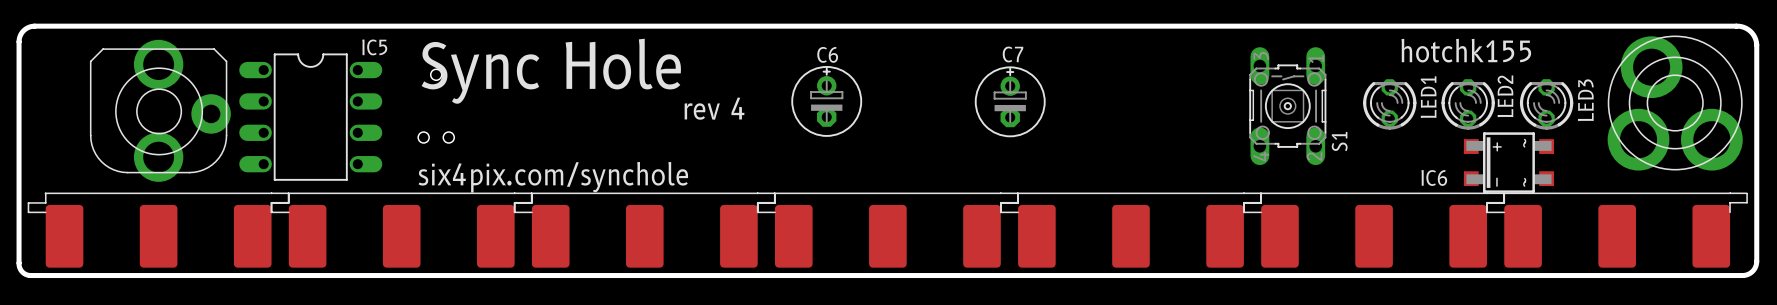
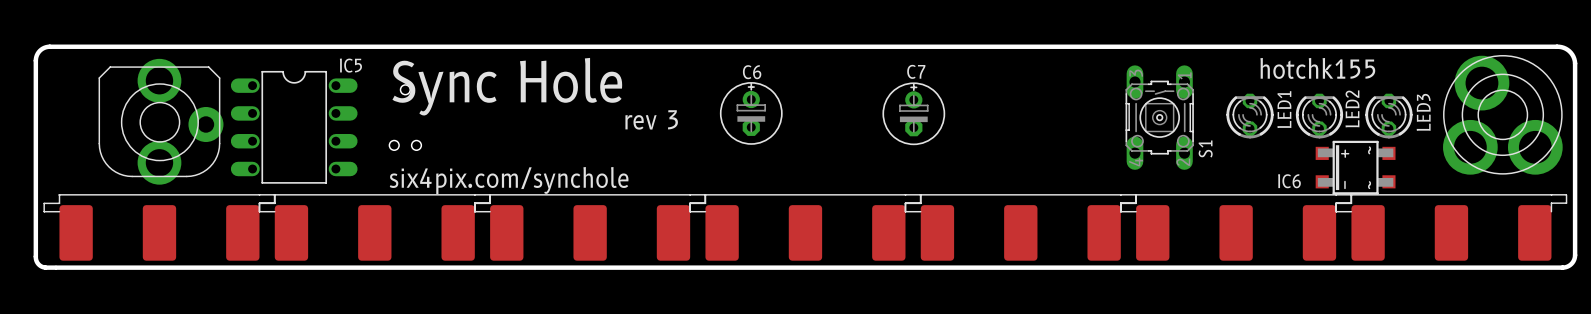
text: rev 4 (714, 108) -> rev 3 (651, 119)

